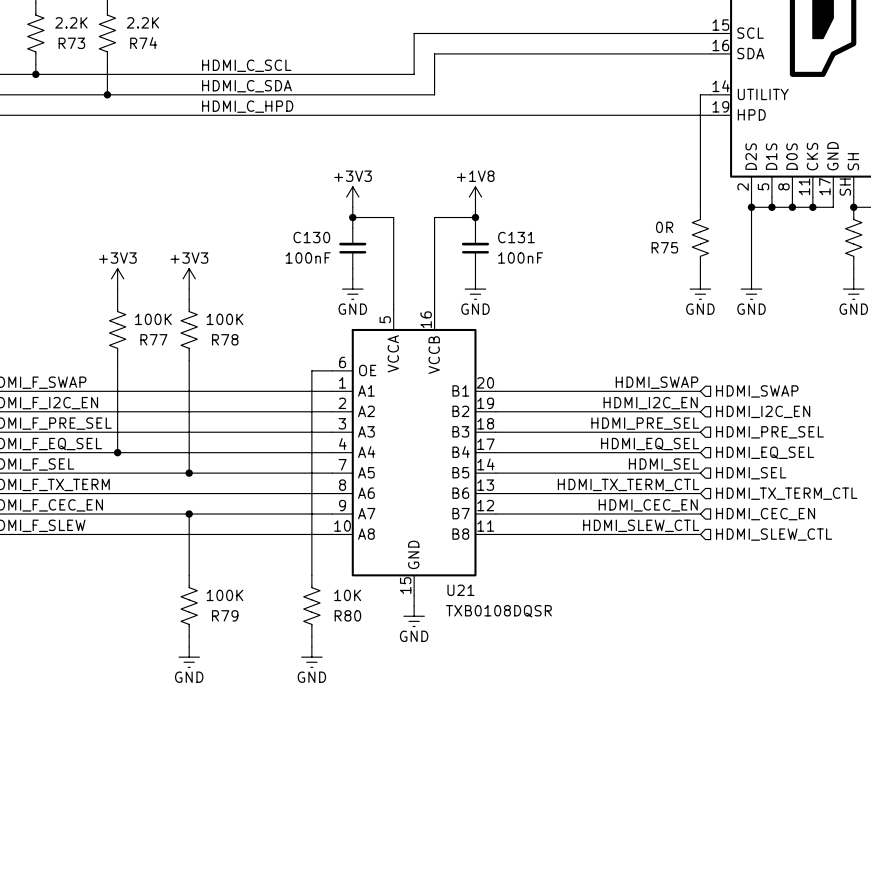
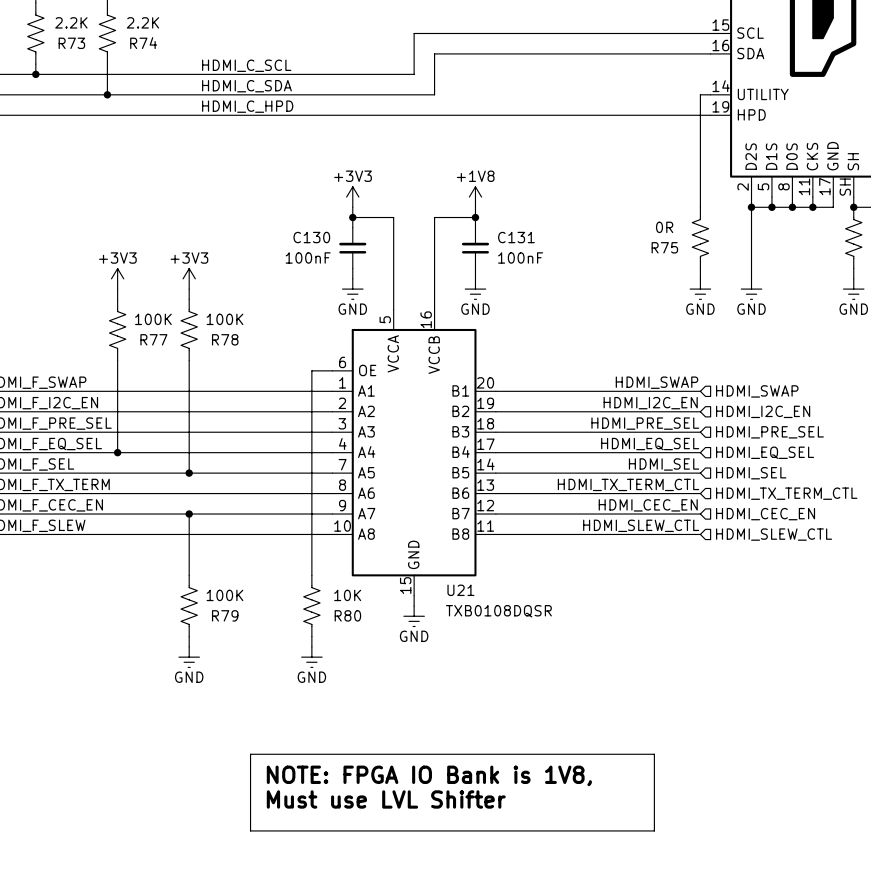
line: none -> (250, 754) (654, 754) (654, 830) (250, 830) (250, 754)
text: none -> NOTE: FPGA IO Bank is 1V8, (429, 775)
text: none -> Must use LVL Shifter (386, 799)

